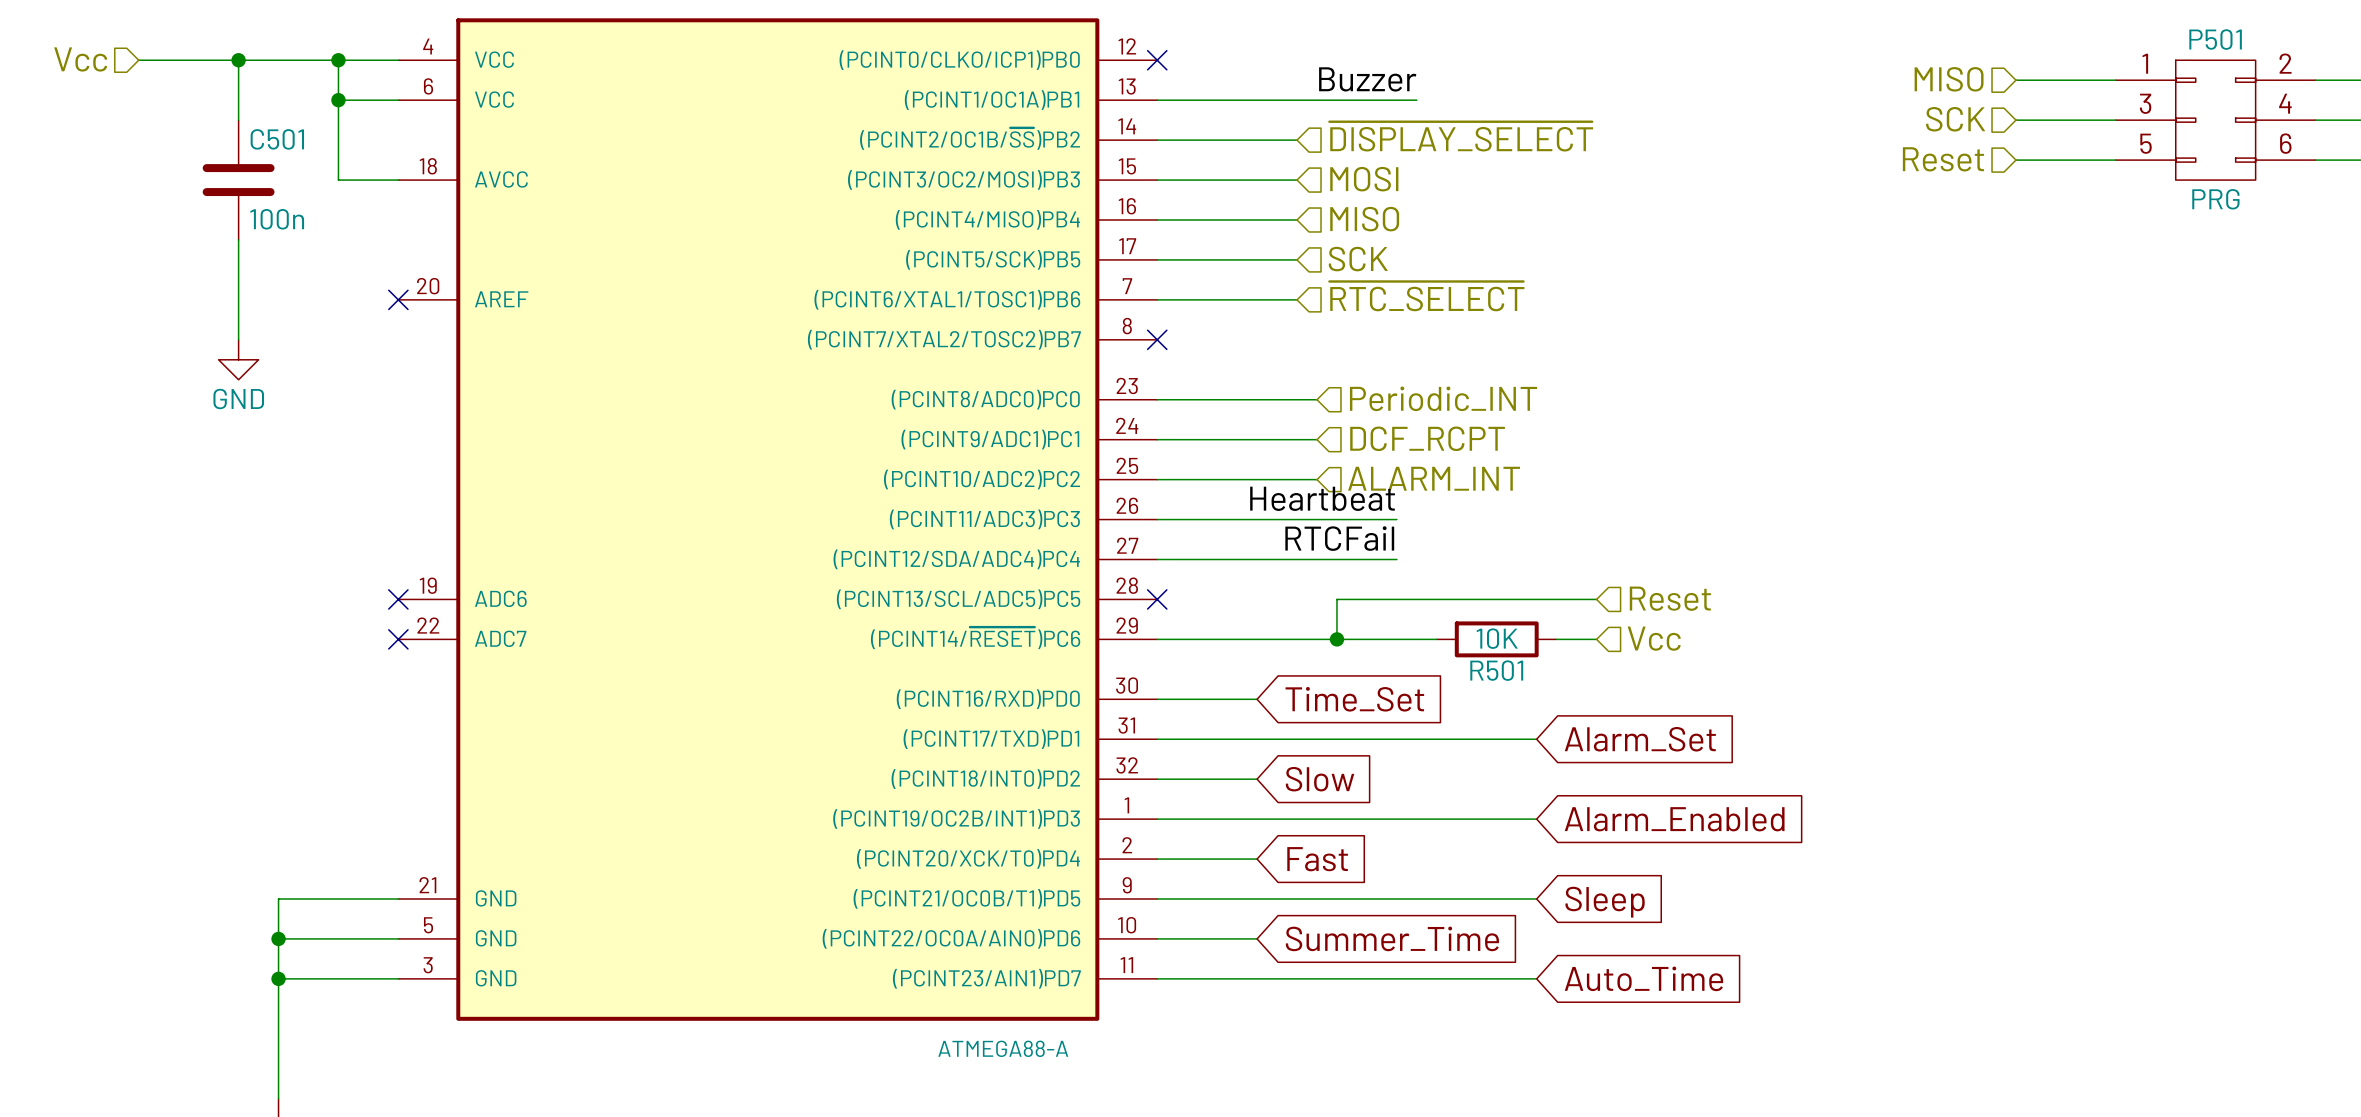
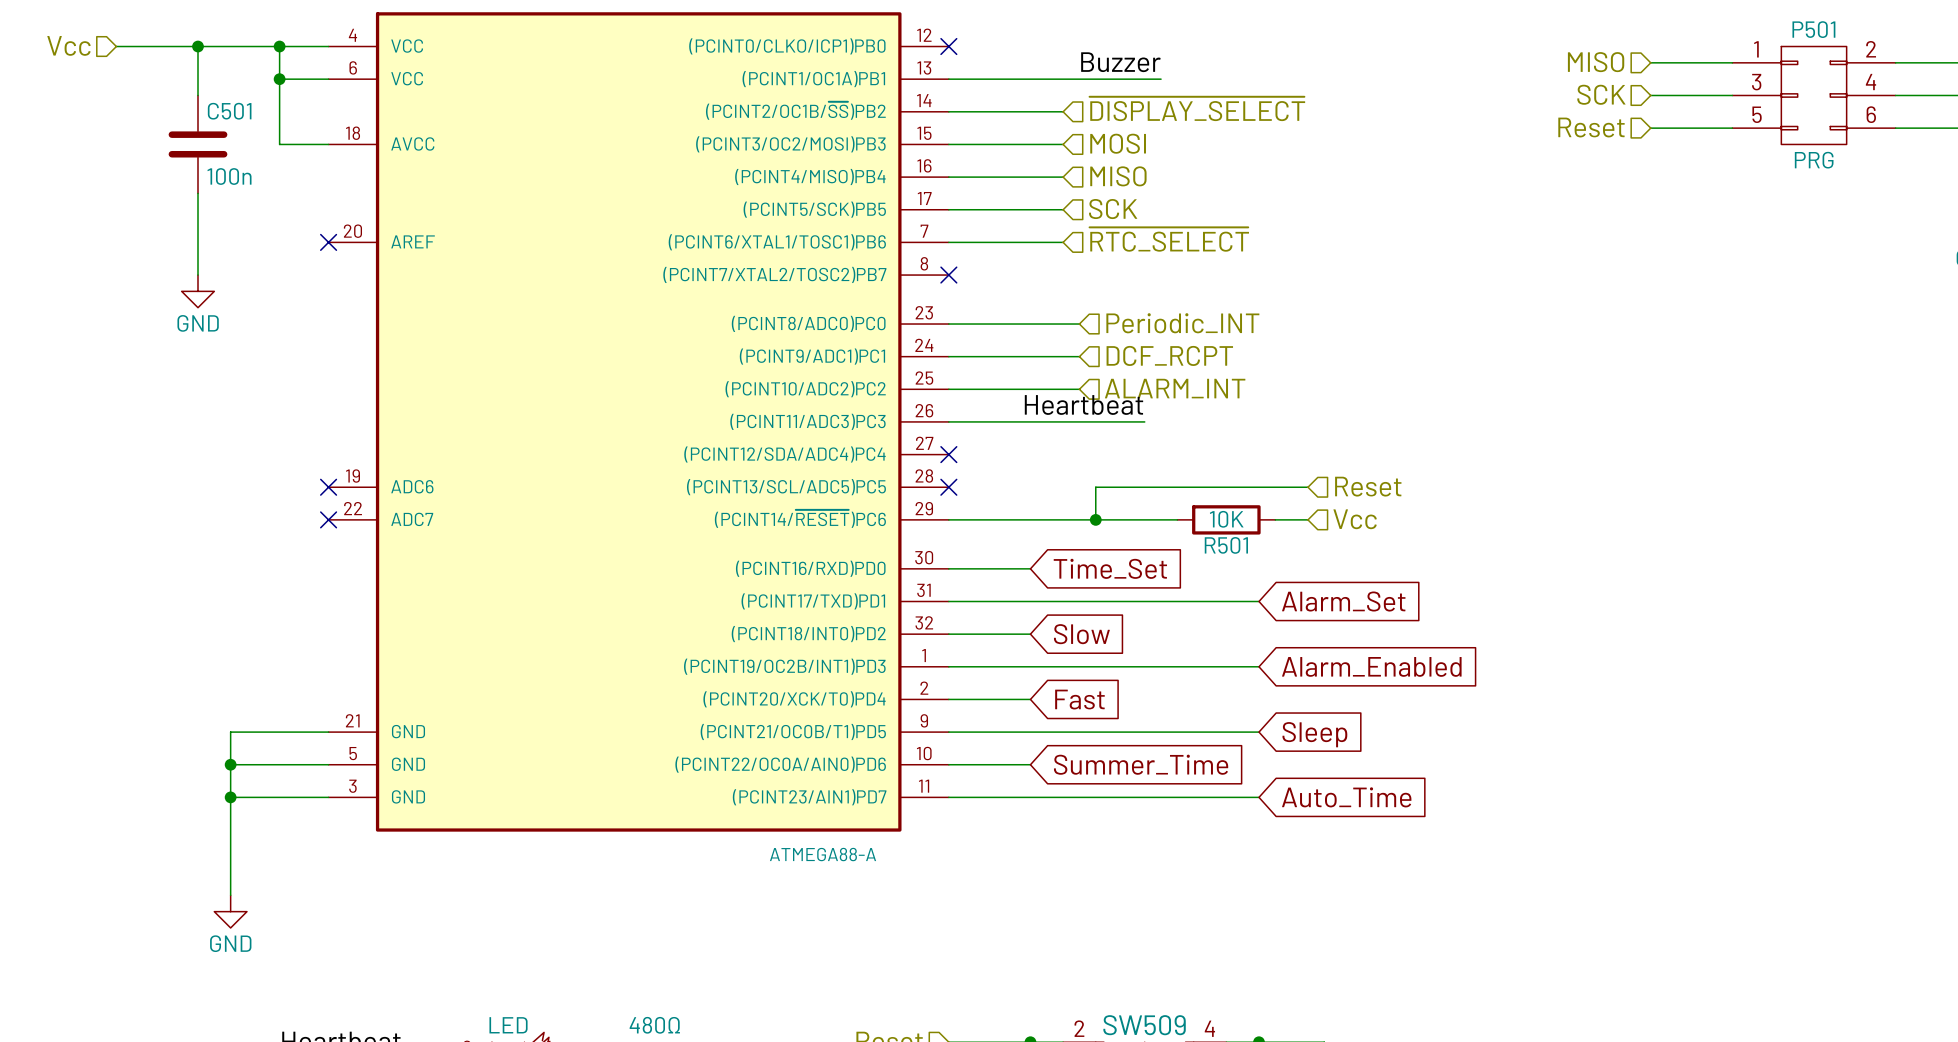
label: RTCFail (1339, 538) -> none
wire: (1157, 559) (1396, 559) -> none
no-connect mark: none -> (948, 454)

